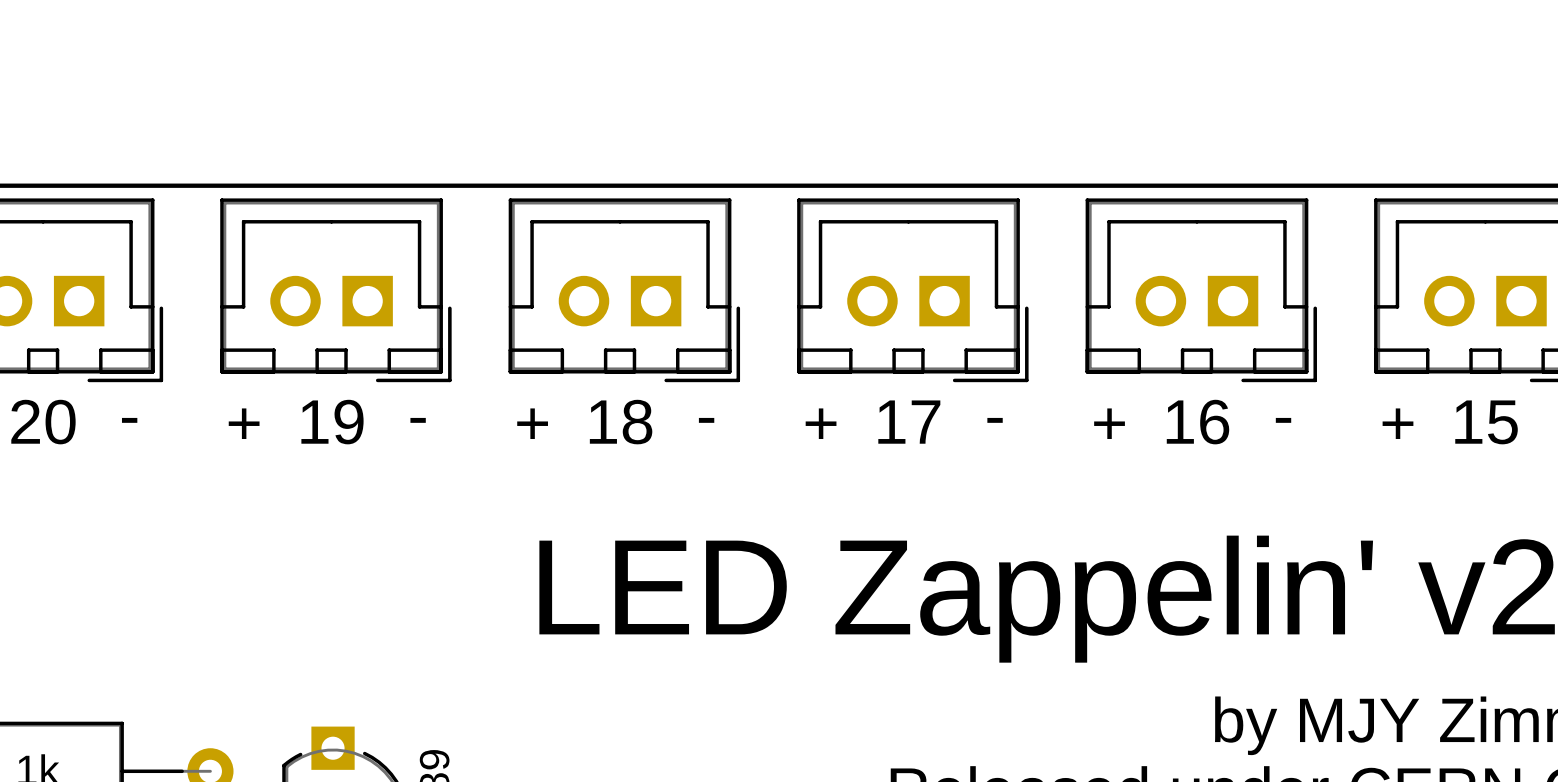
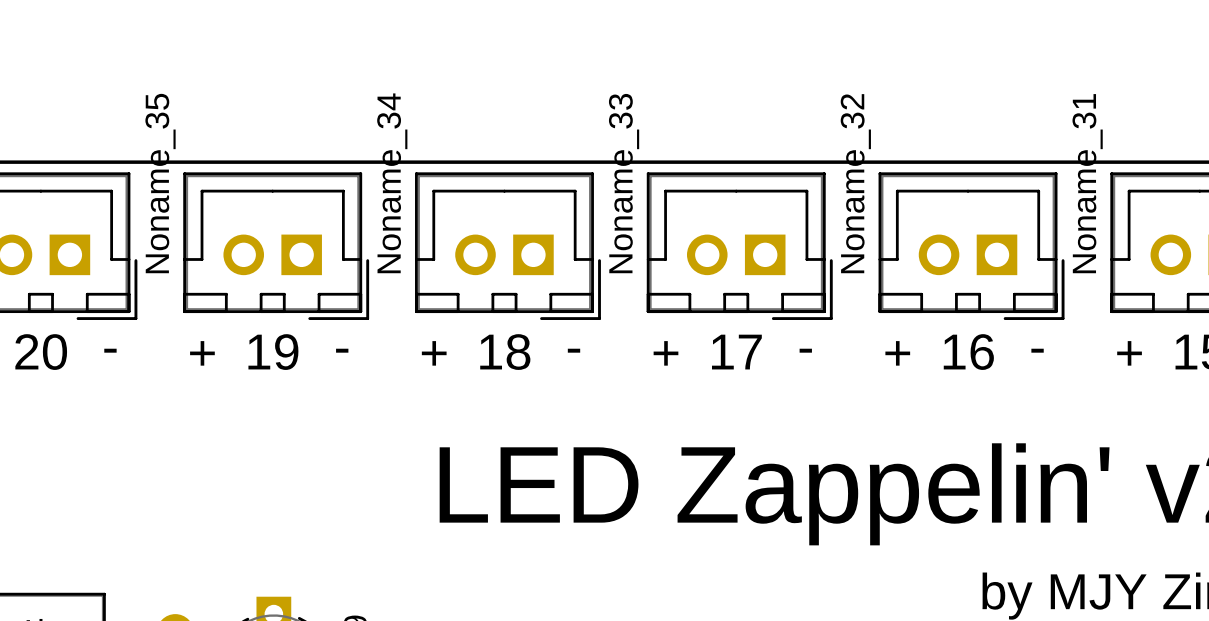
Noname_35 name: none -> Noname_35 (160, 183)
Noname_34 name: none -> Noname_34 (392, 183)
Noname_33 name: none -> Noname_33 (624, 183)
Noname_32 name: none -> Noname_32 (855, 183)
Noname_31 name: none -> Noname_31 (1087, 183)

